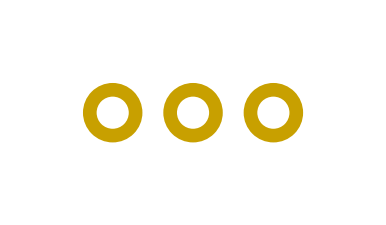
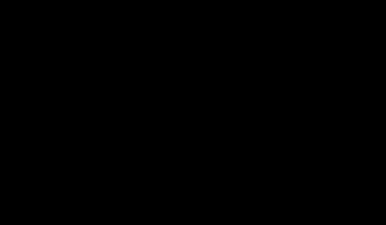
part: (193, 112) -> none

